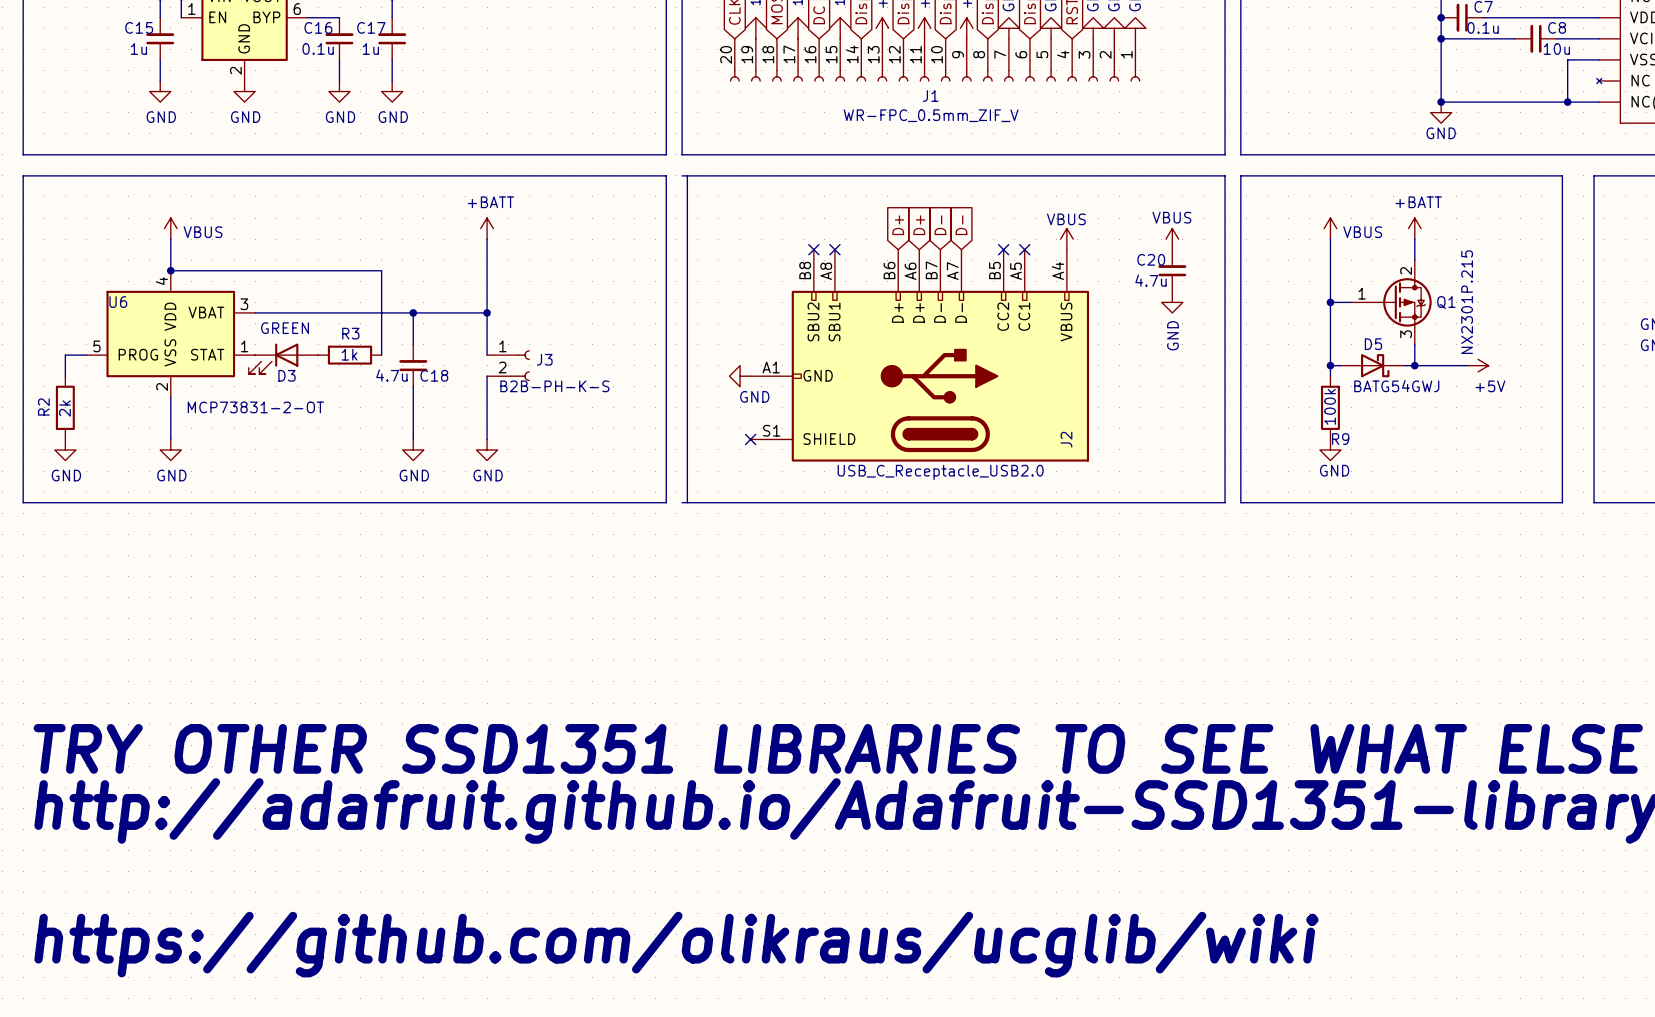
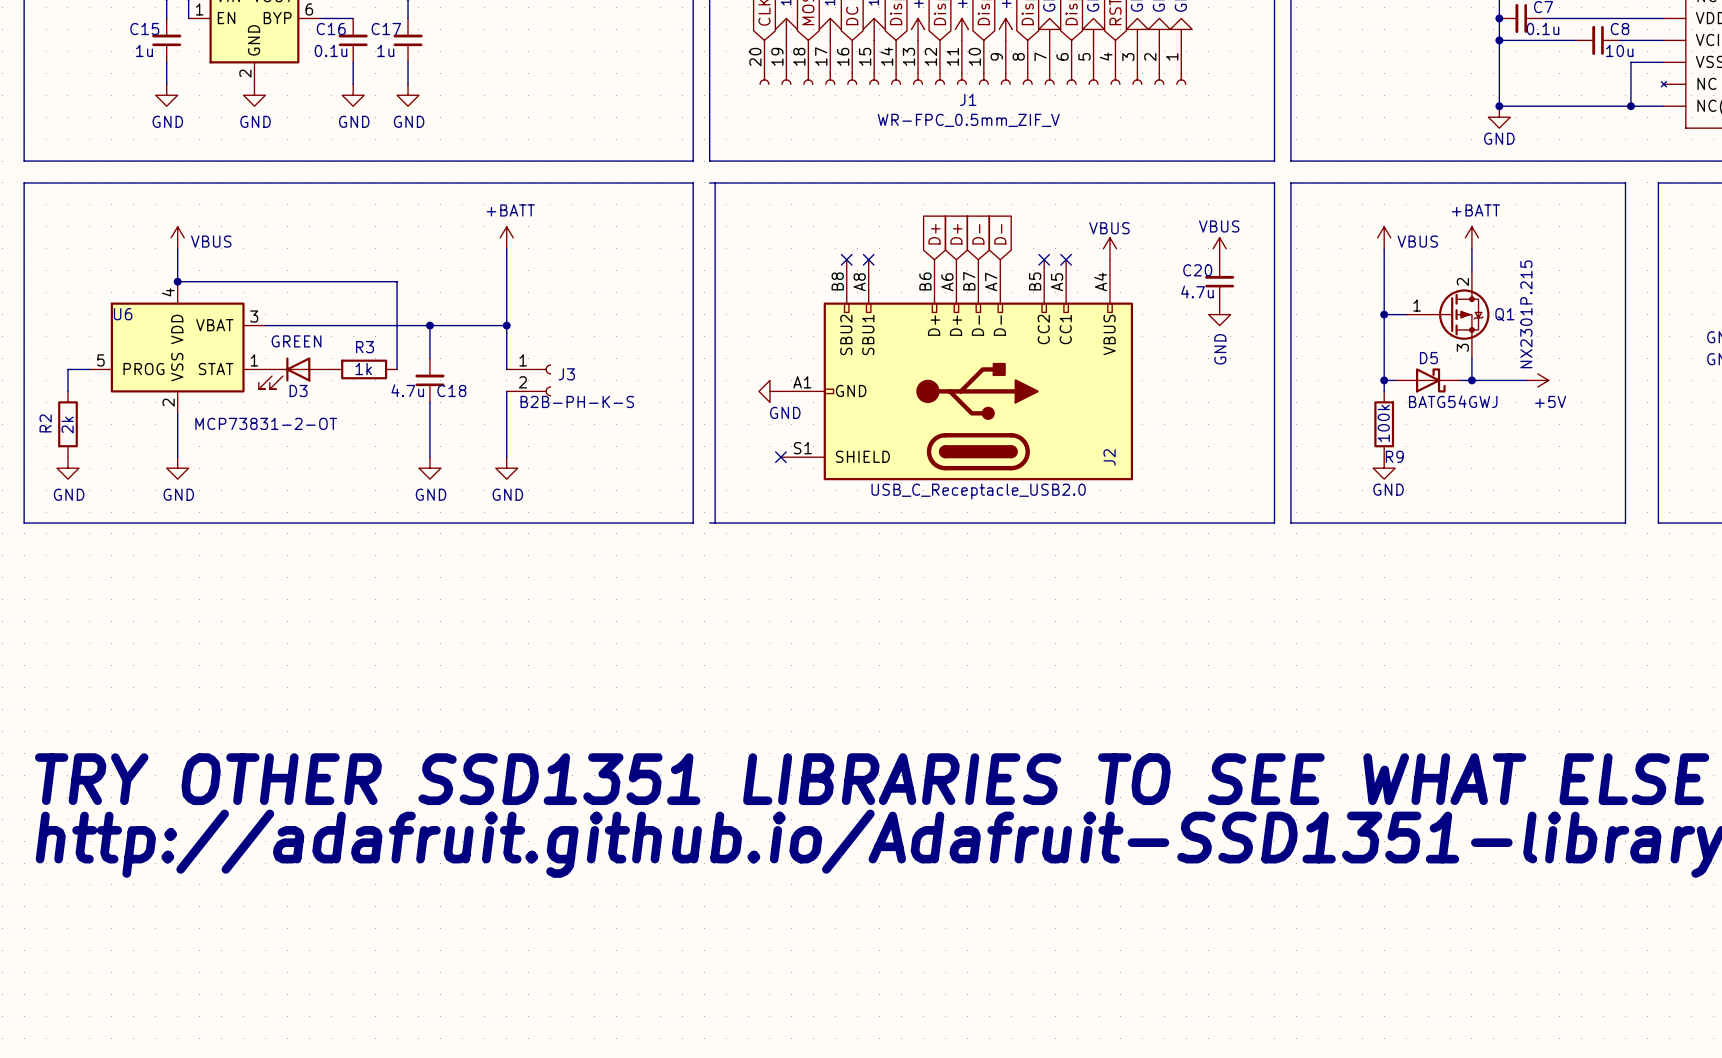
text: https://github.com/olikraus/ucglib/wiki (676, 944) -> none

